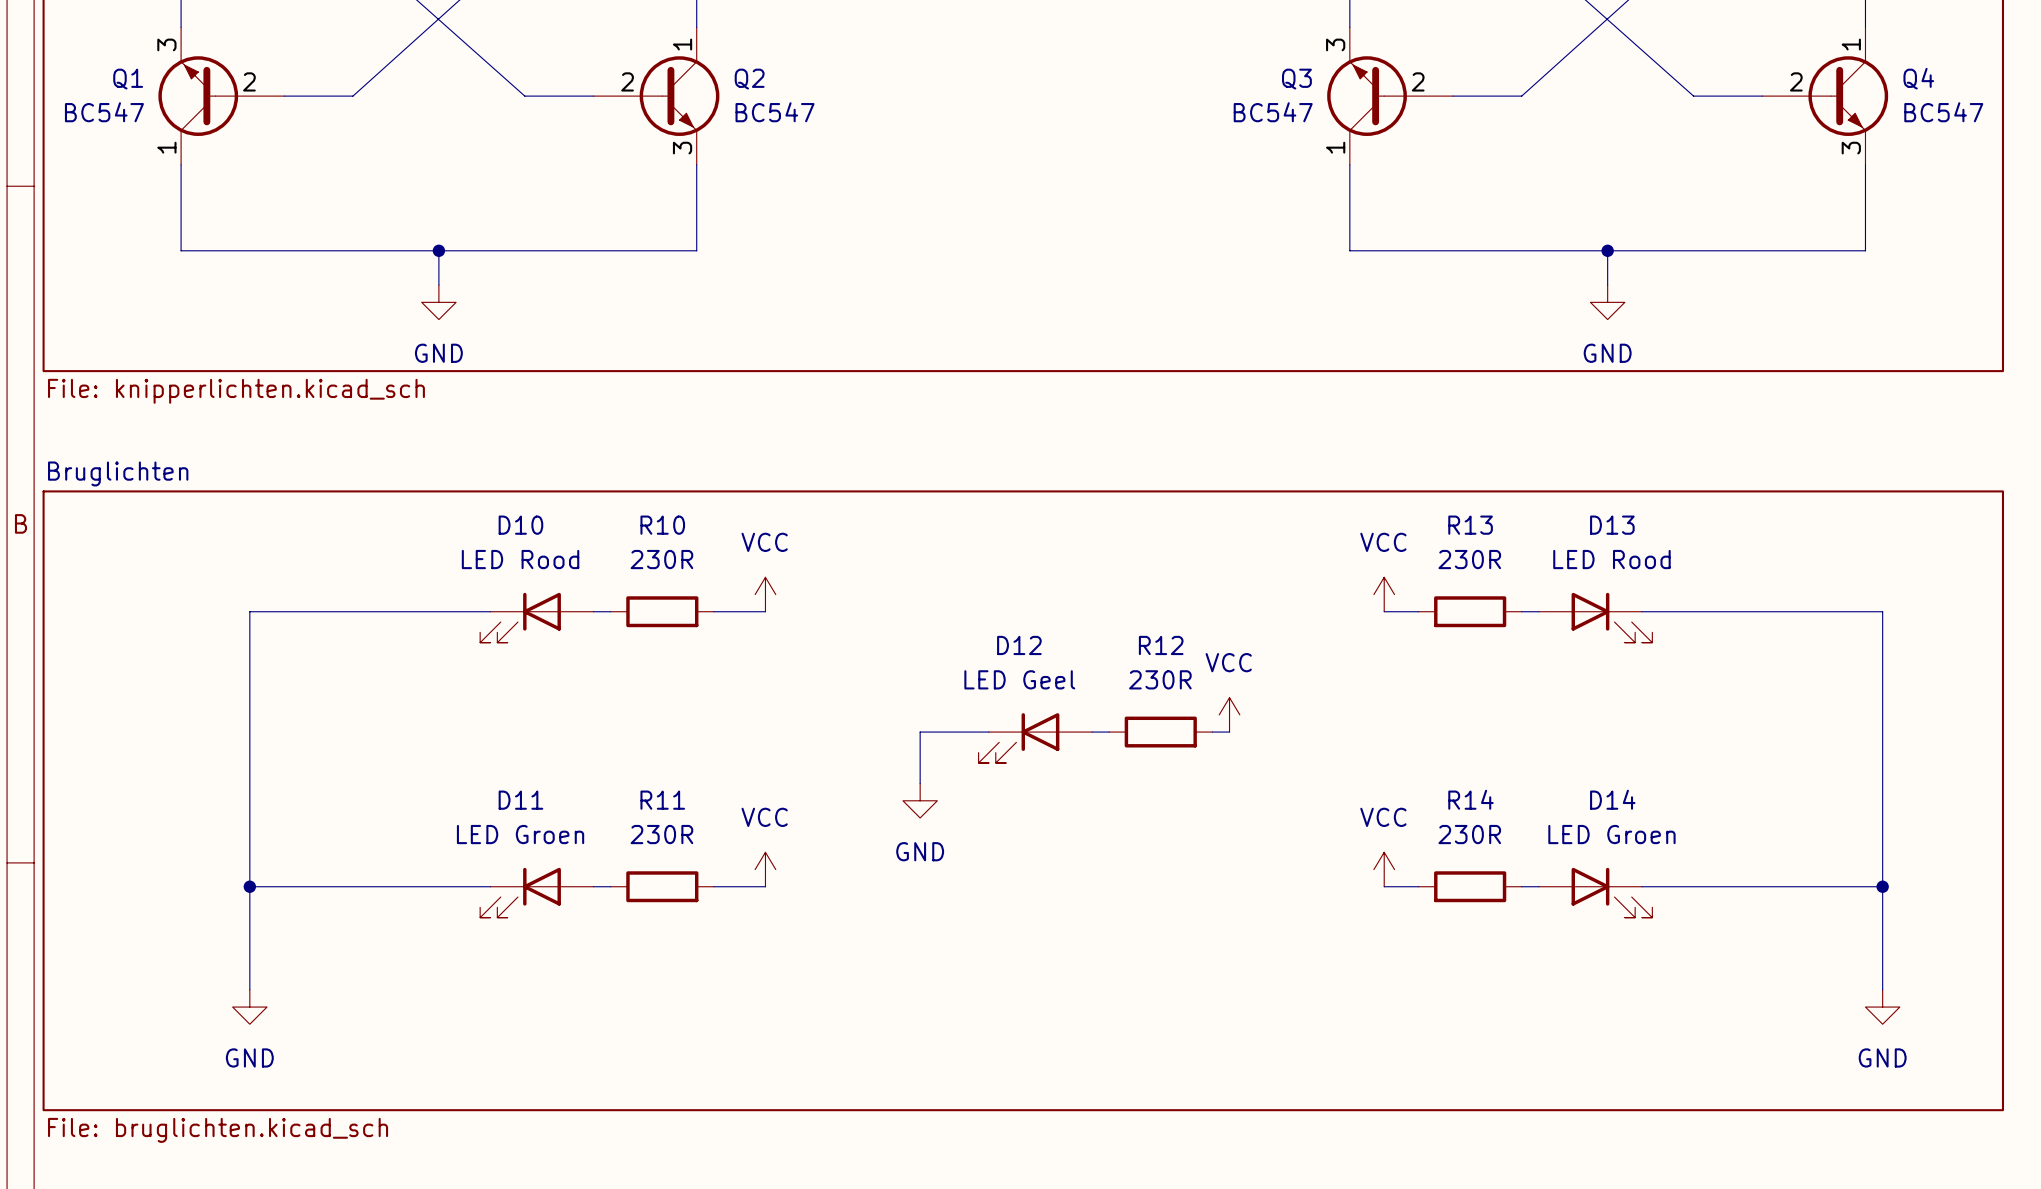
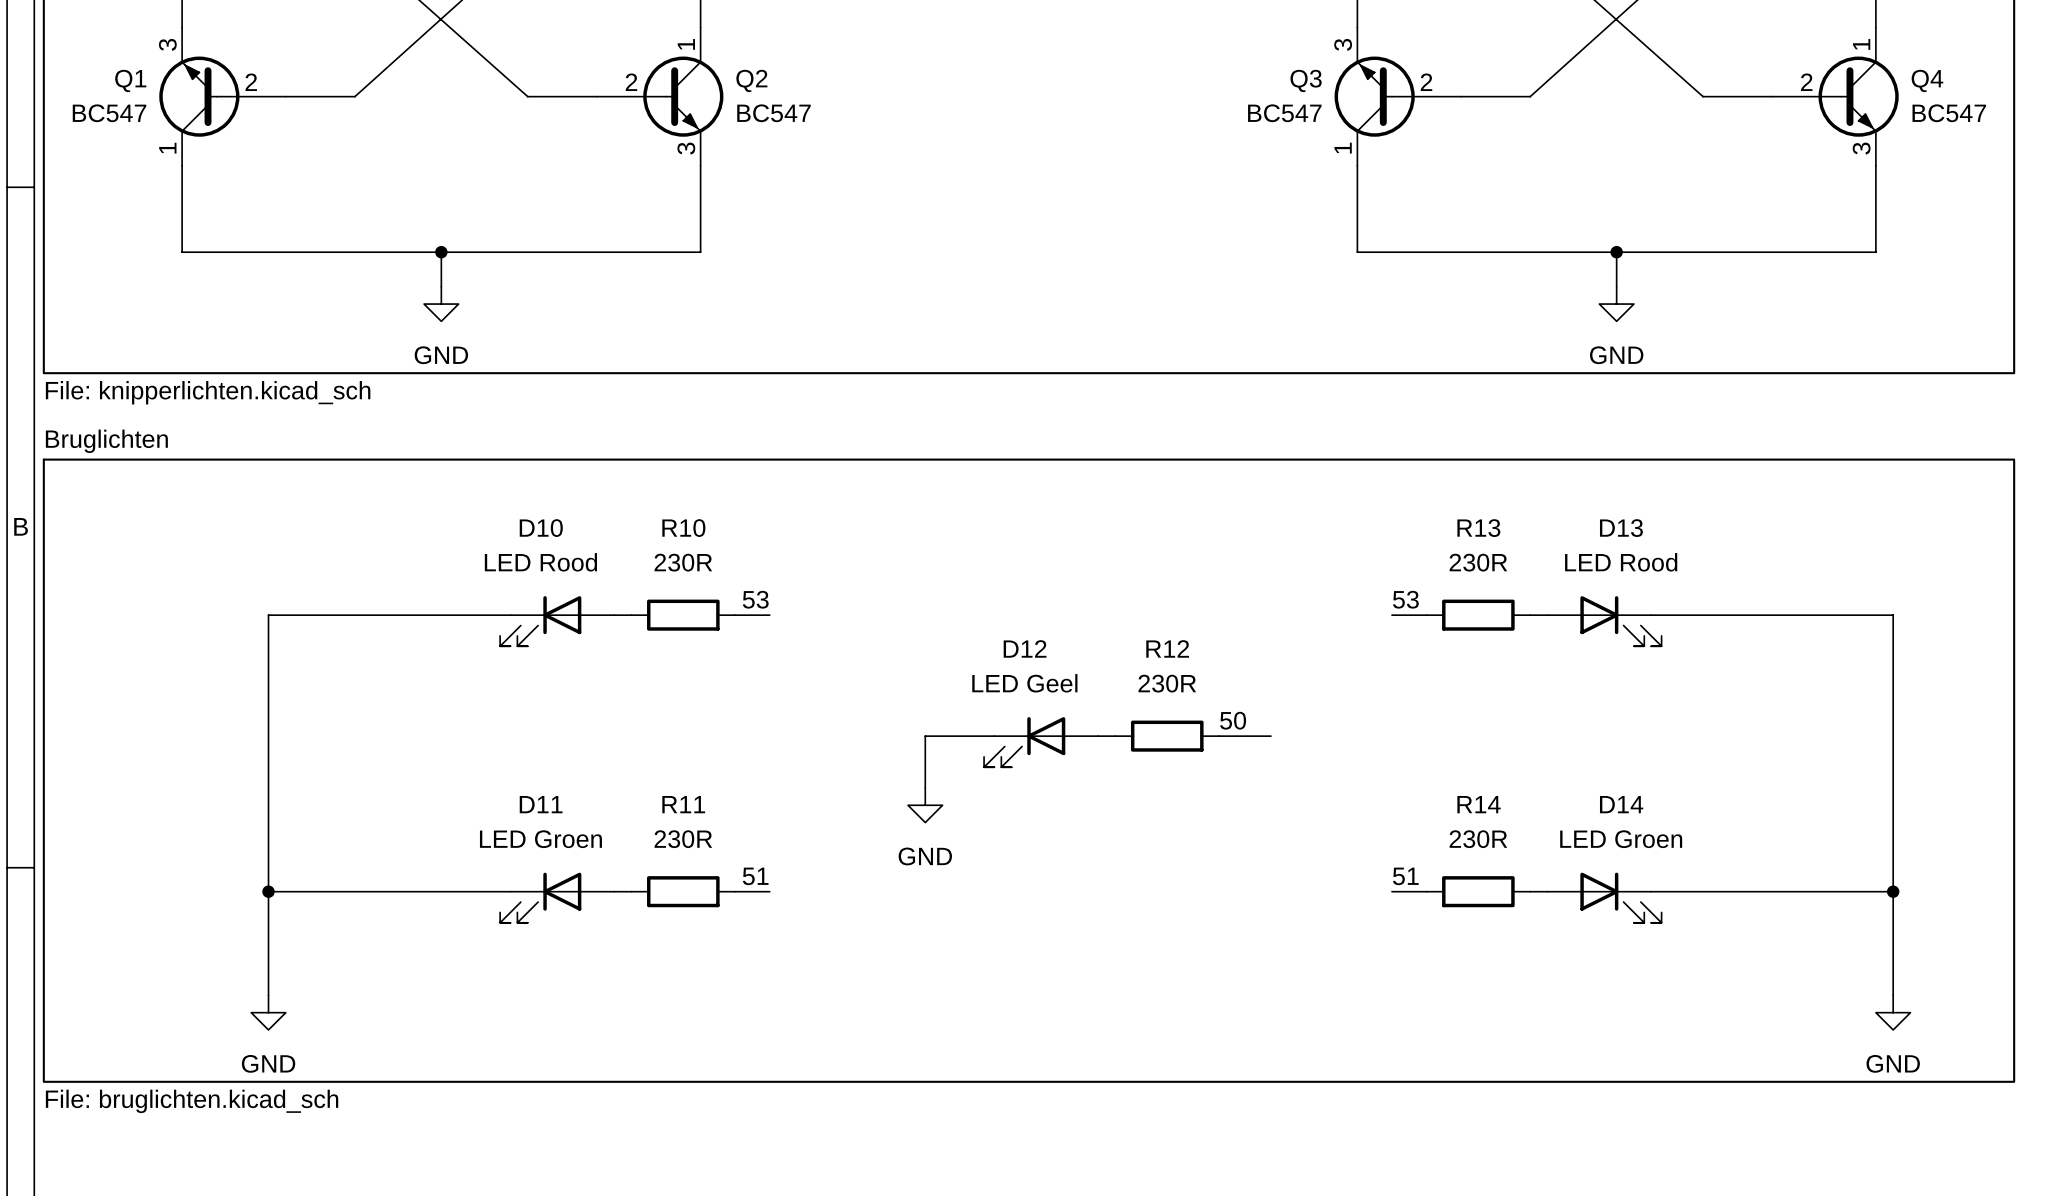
power symbol: VCC (765, 594) -> none
power symbol: VCC (1384, 594) -> none
label: none -> 53 (755, 599)
label: none -> 53 (1405, 599)
wire: (267, 611) (249, 611) (249, 989) -> (268, 615) (268, 995)
R10 position: (662, 611) -> (683, 615)
D10 position: (536, 617) -> (557, 621)
power symbol: VCC (1229, 714) -> none
label: none -> 50 (1233, 720)
wire: none -> (1236, 736) (1270, 736)
sheet Bruglichten position: (1023, 800) -> (1028, 770)
power symbol: VCC (765, 869) -> none
power symbol: VCC (1384, 869) -> none
label: none -> 51 (755, 876)
label: none -> 51 (1405, 876)
wire: (249, 886) (267, 886) -> none
junction position: (249, 886) -> (268, 891)
R11 position: (662, 886) -> (683, 891)
D11 position: (536, 892) -> (557, 897)
power symbol position: GND (249, 1007) -> GND (268, 1012)

